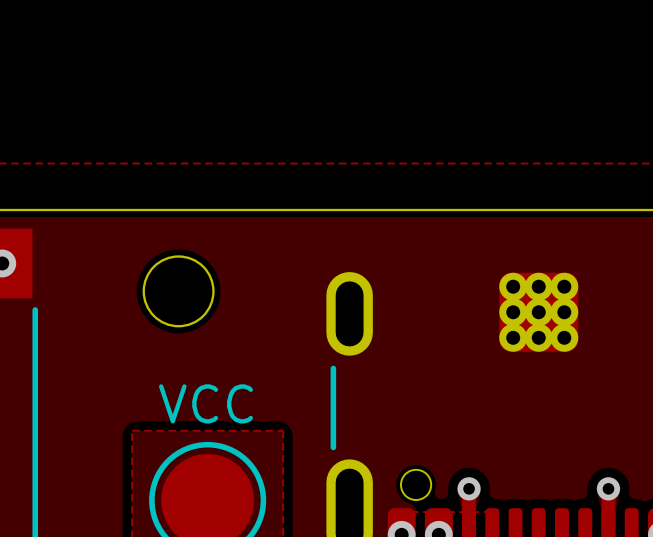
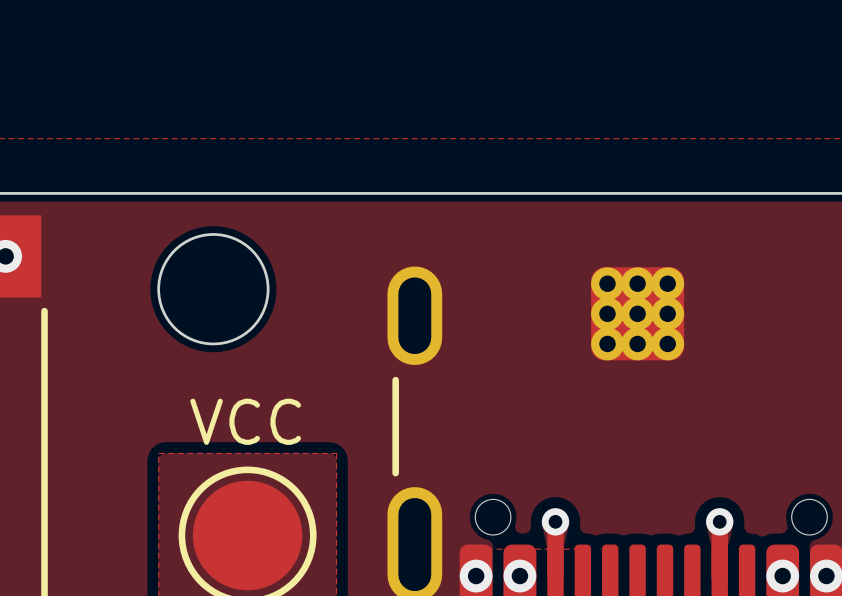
round board edge size: [142, 255, 215, 328] -> [157, 233, 270, 346]

